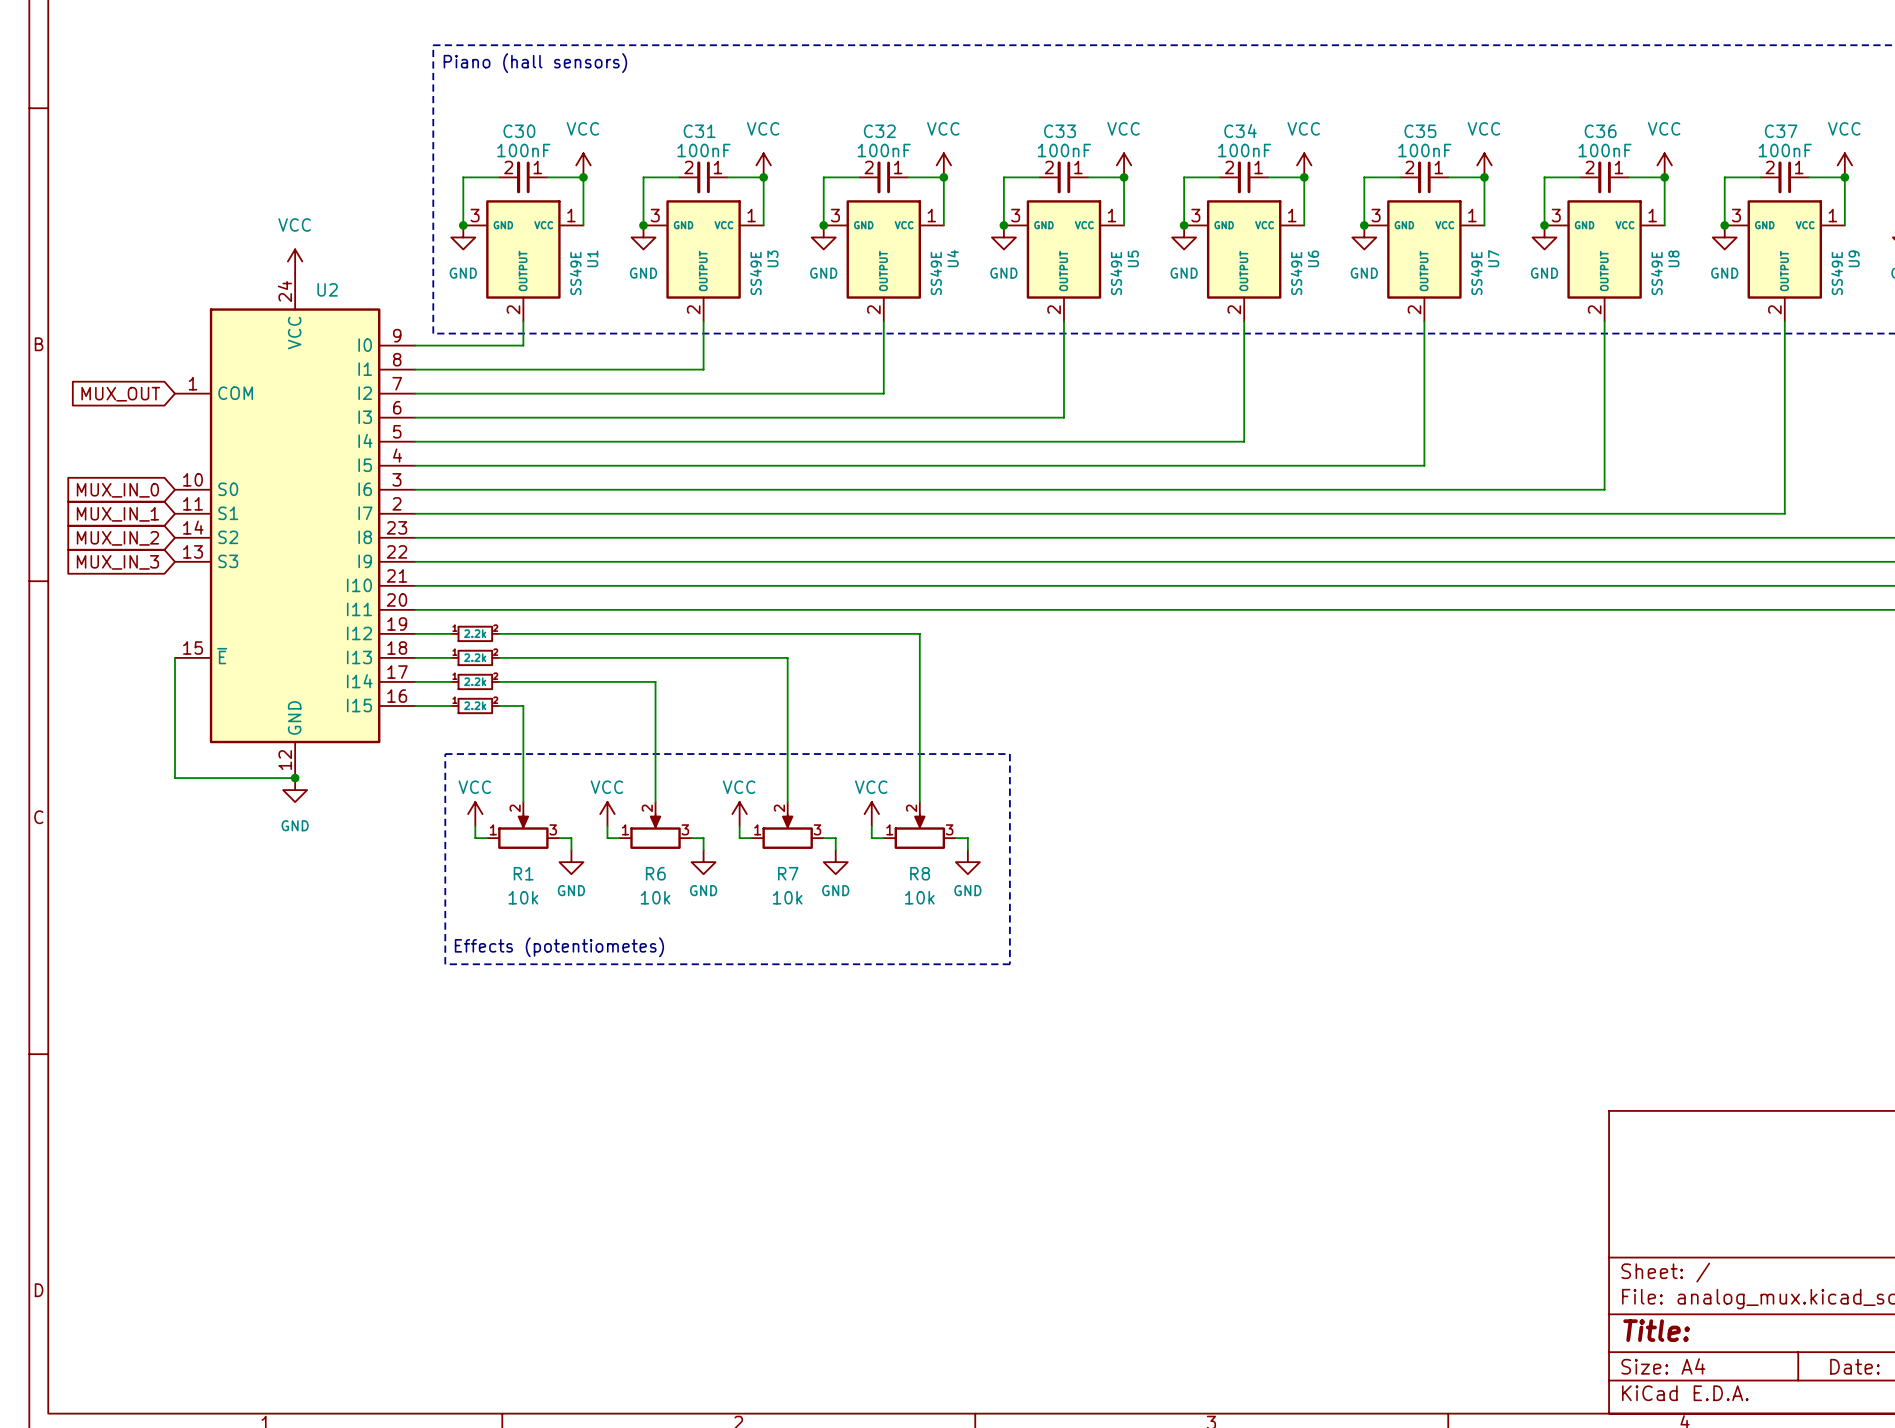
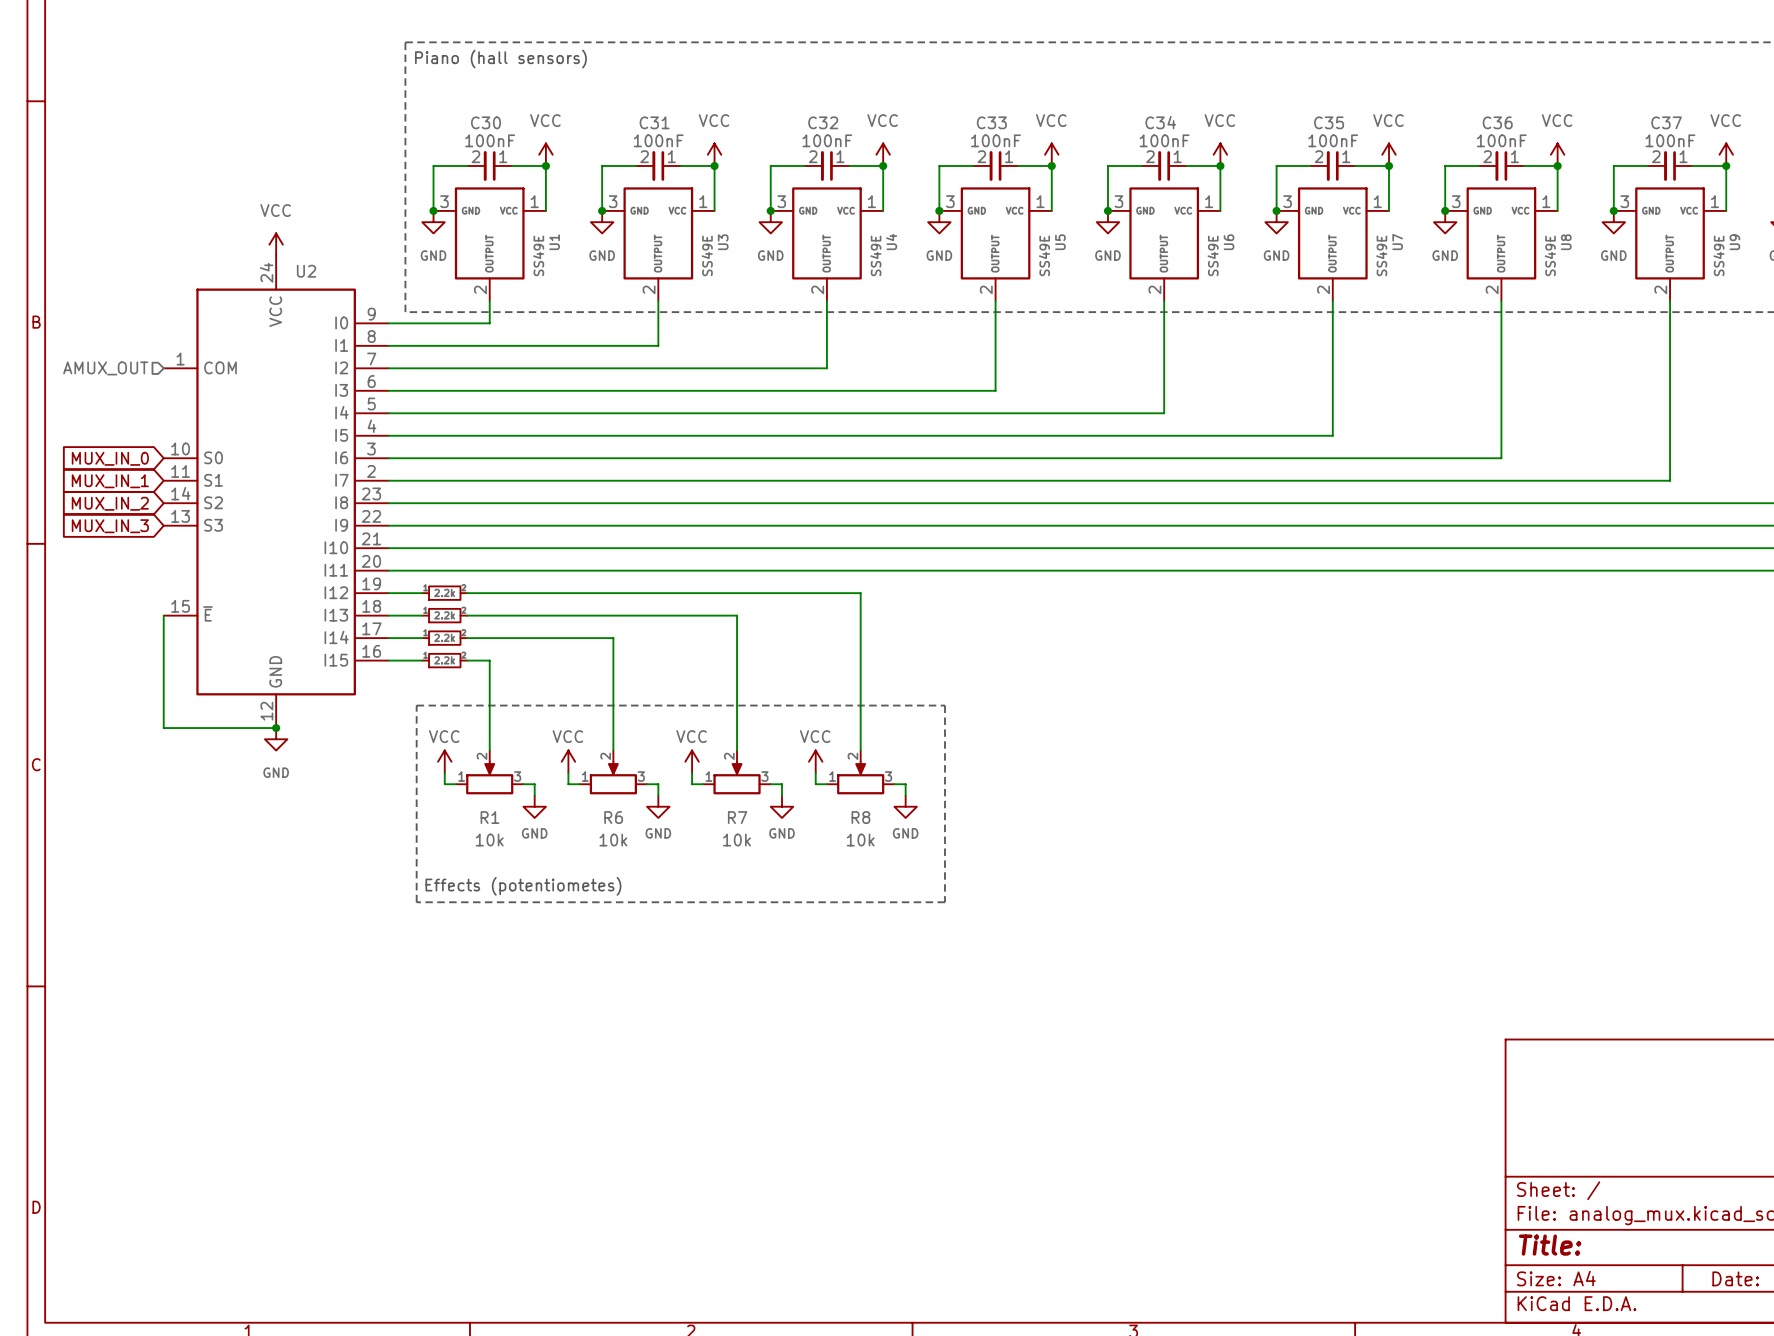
hierarchical label: none -> AMUX_OUT (105, 368)
global label: MUX_OUT (120, 394) -> none

